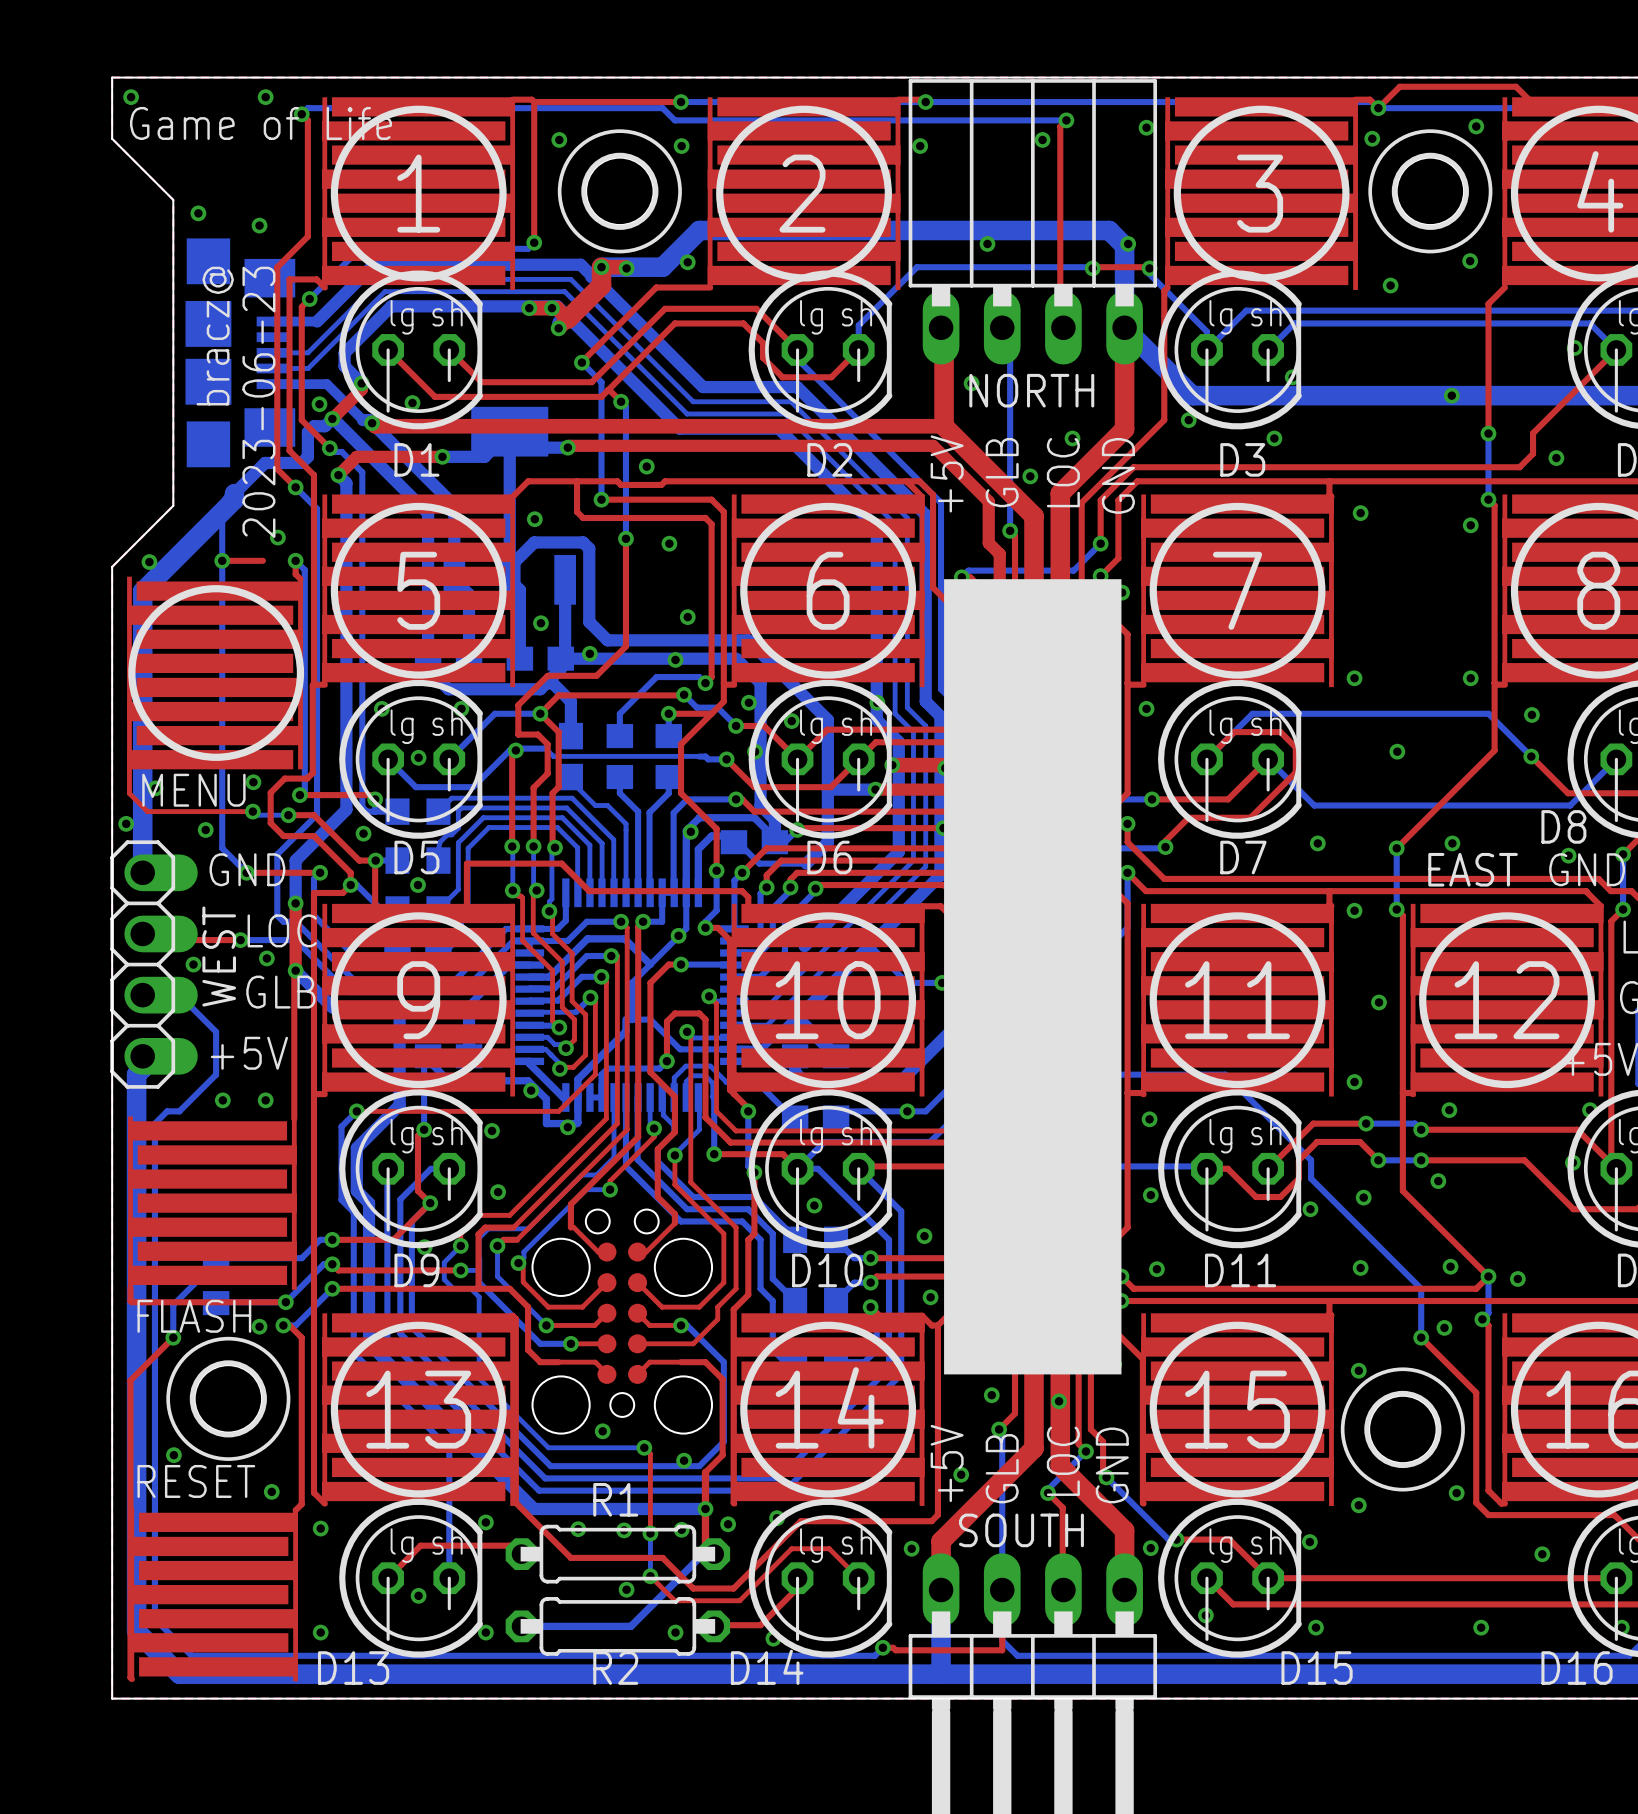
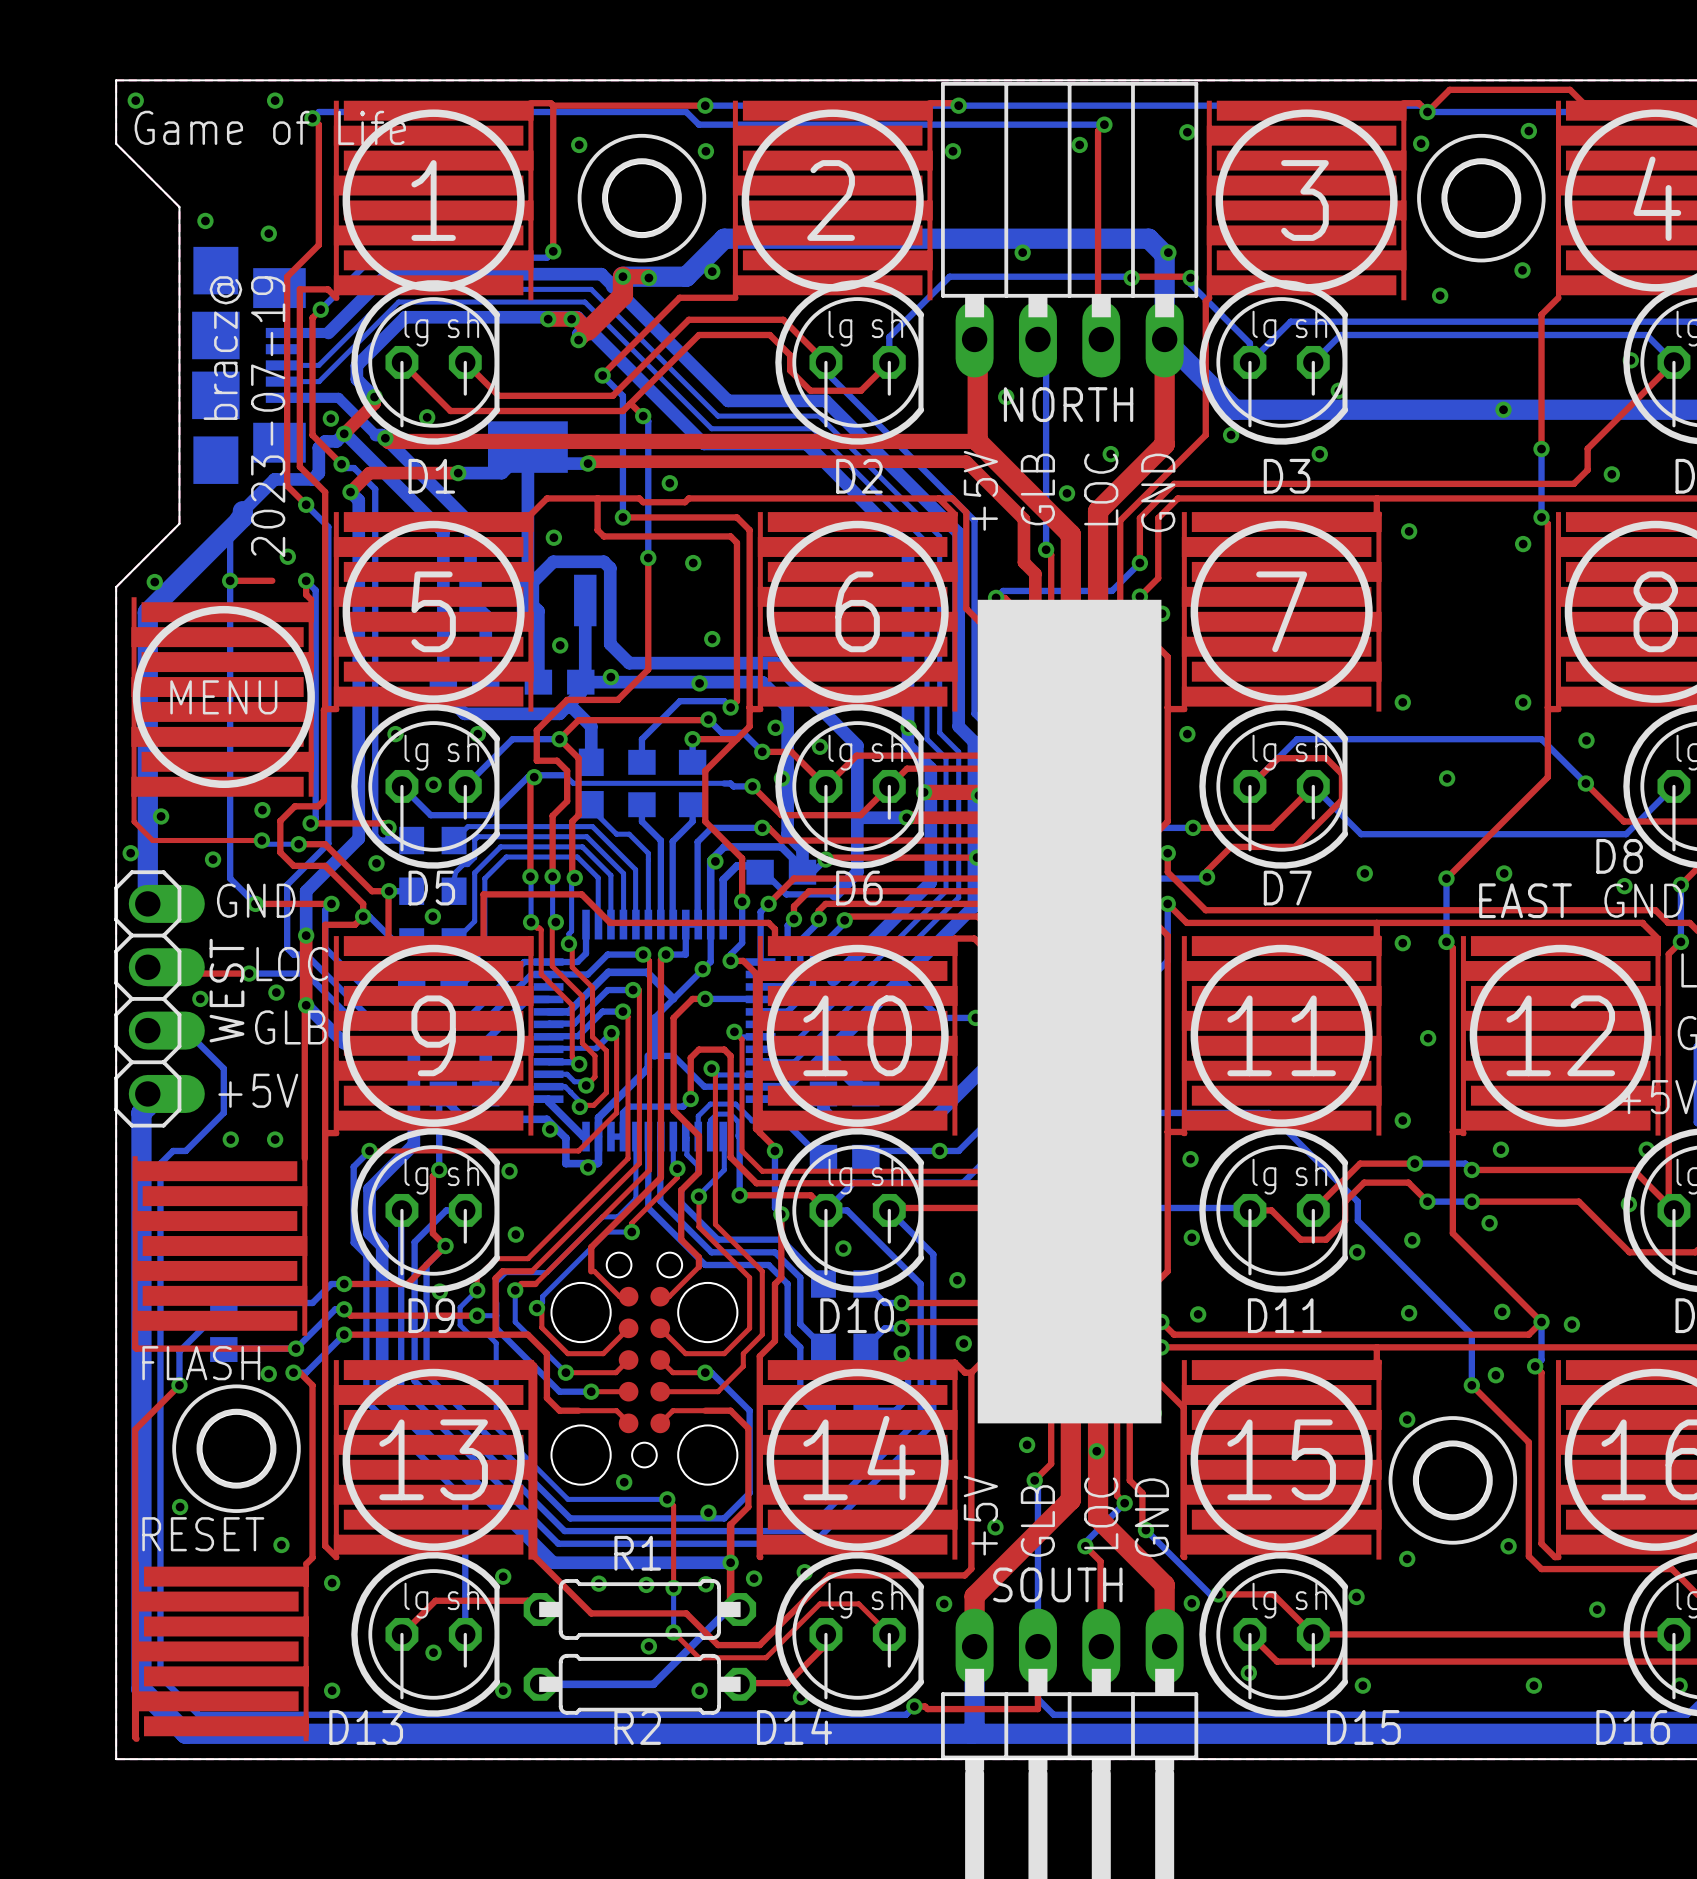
text: 2023-06-23 (258, 402) -> 2023-07-19 (268, 416)
part value position: MENU (193, 790) -> MENU (223, 697)

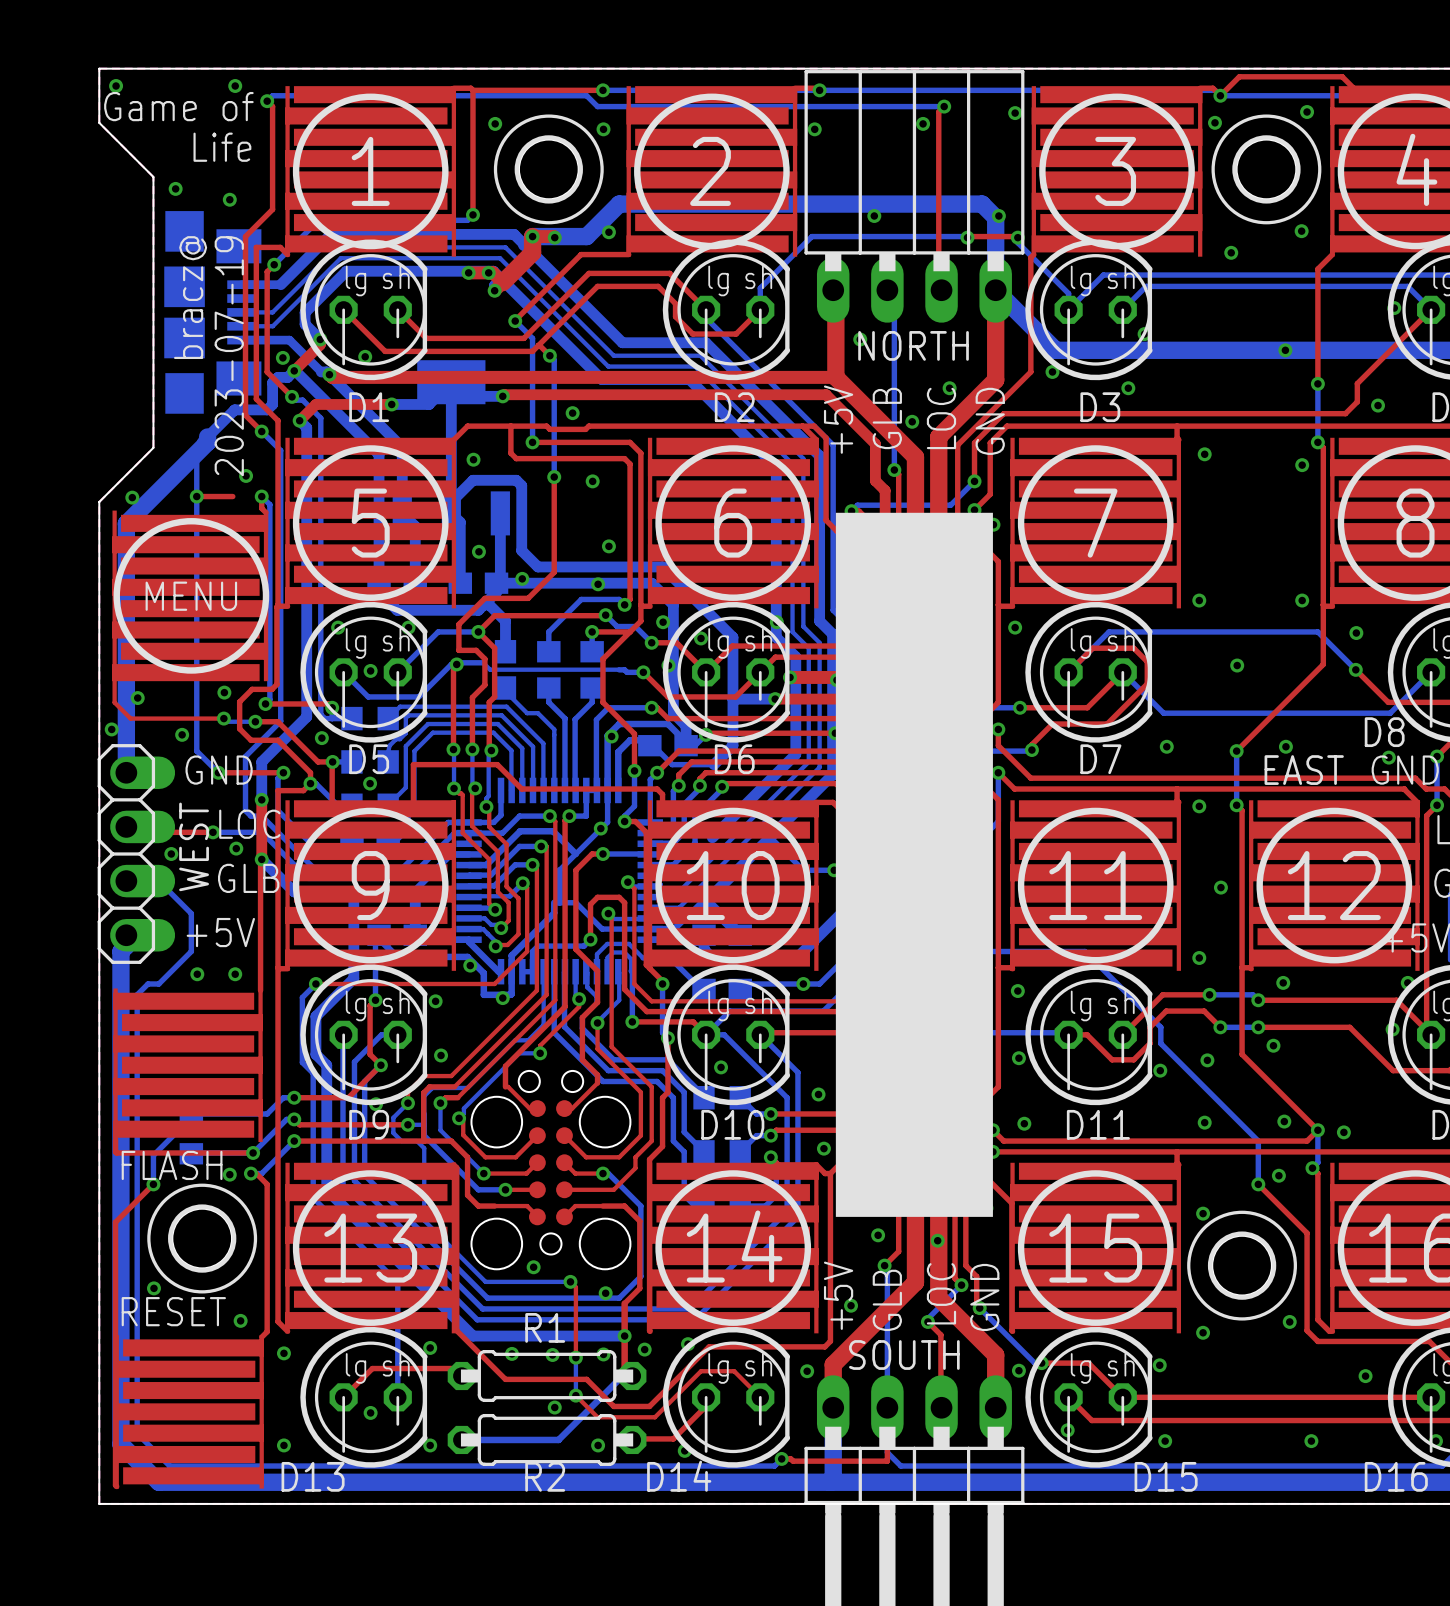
text: Game of Life (270, 127) -> Game of (178, 106)
text: none -> Life (222, 147)

